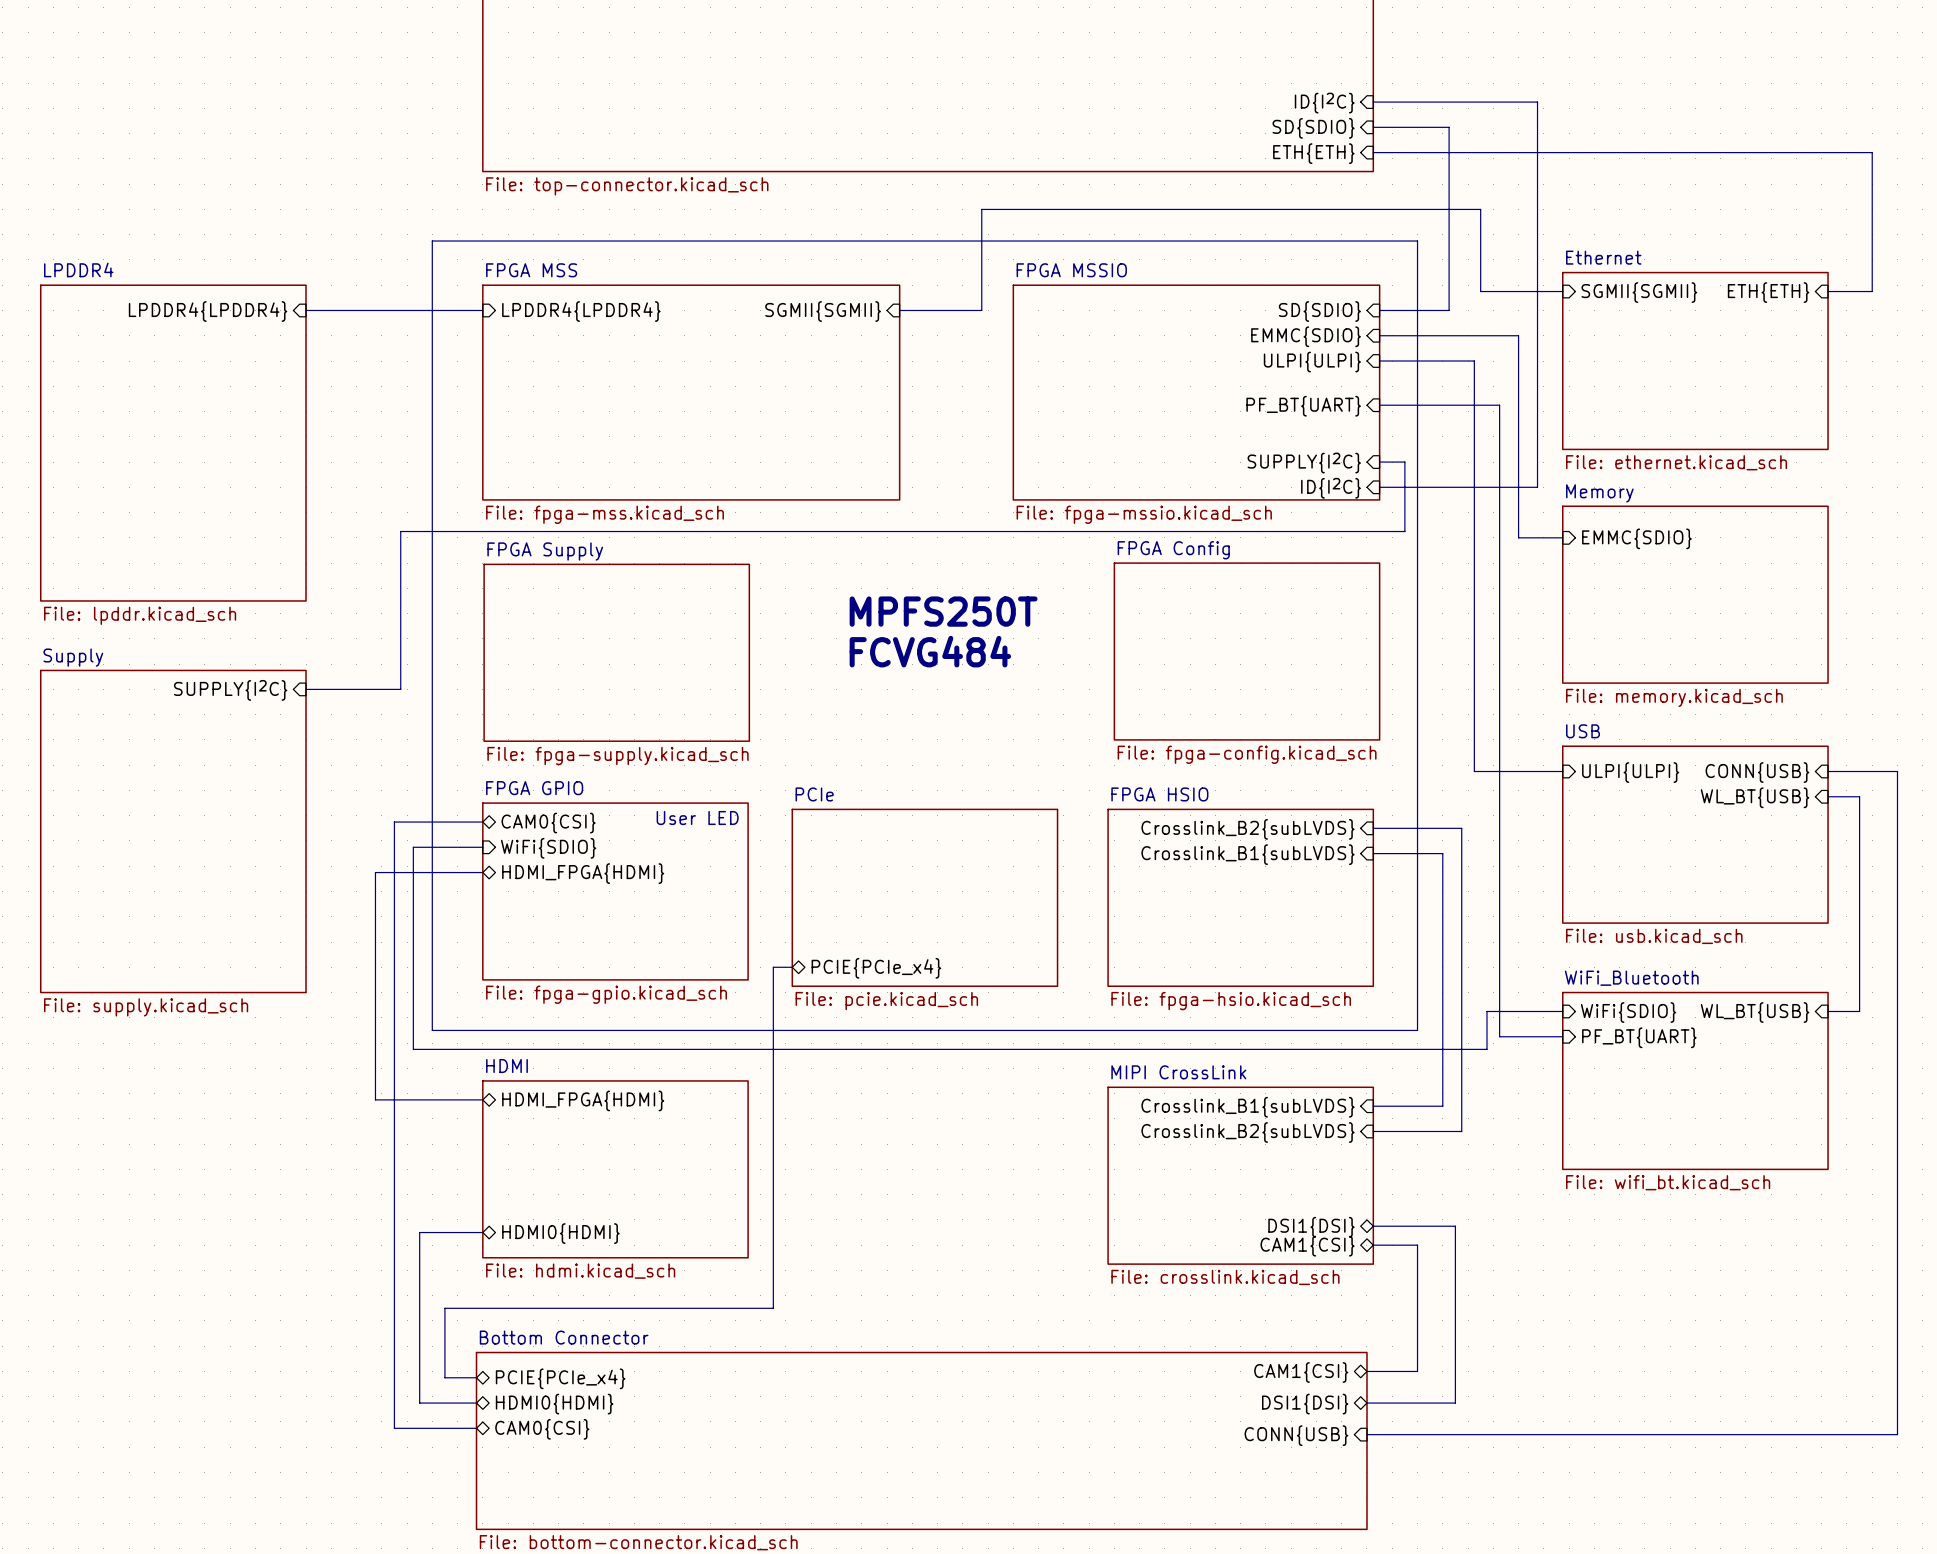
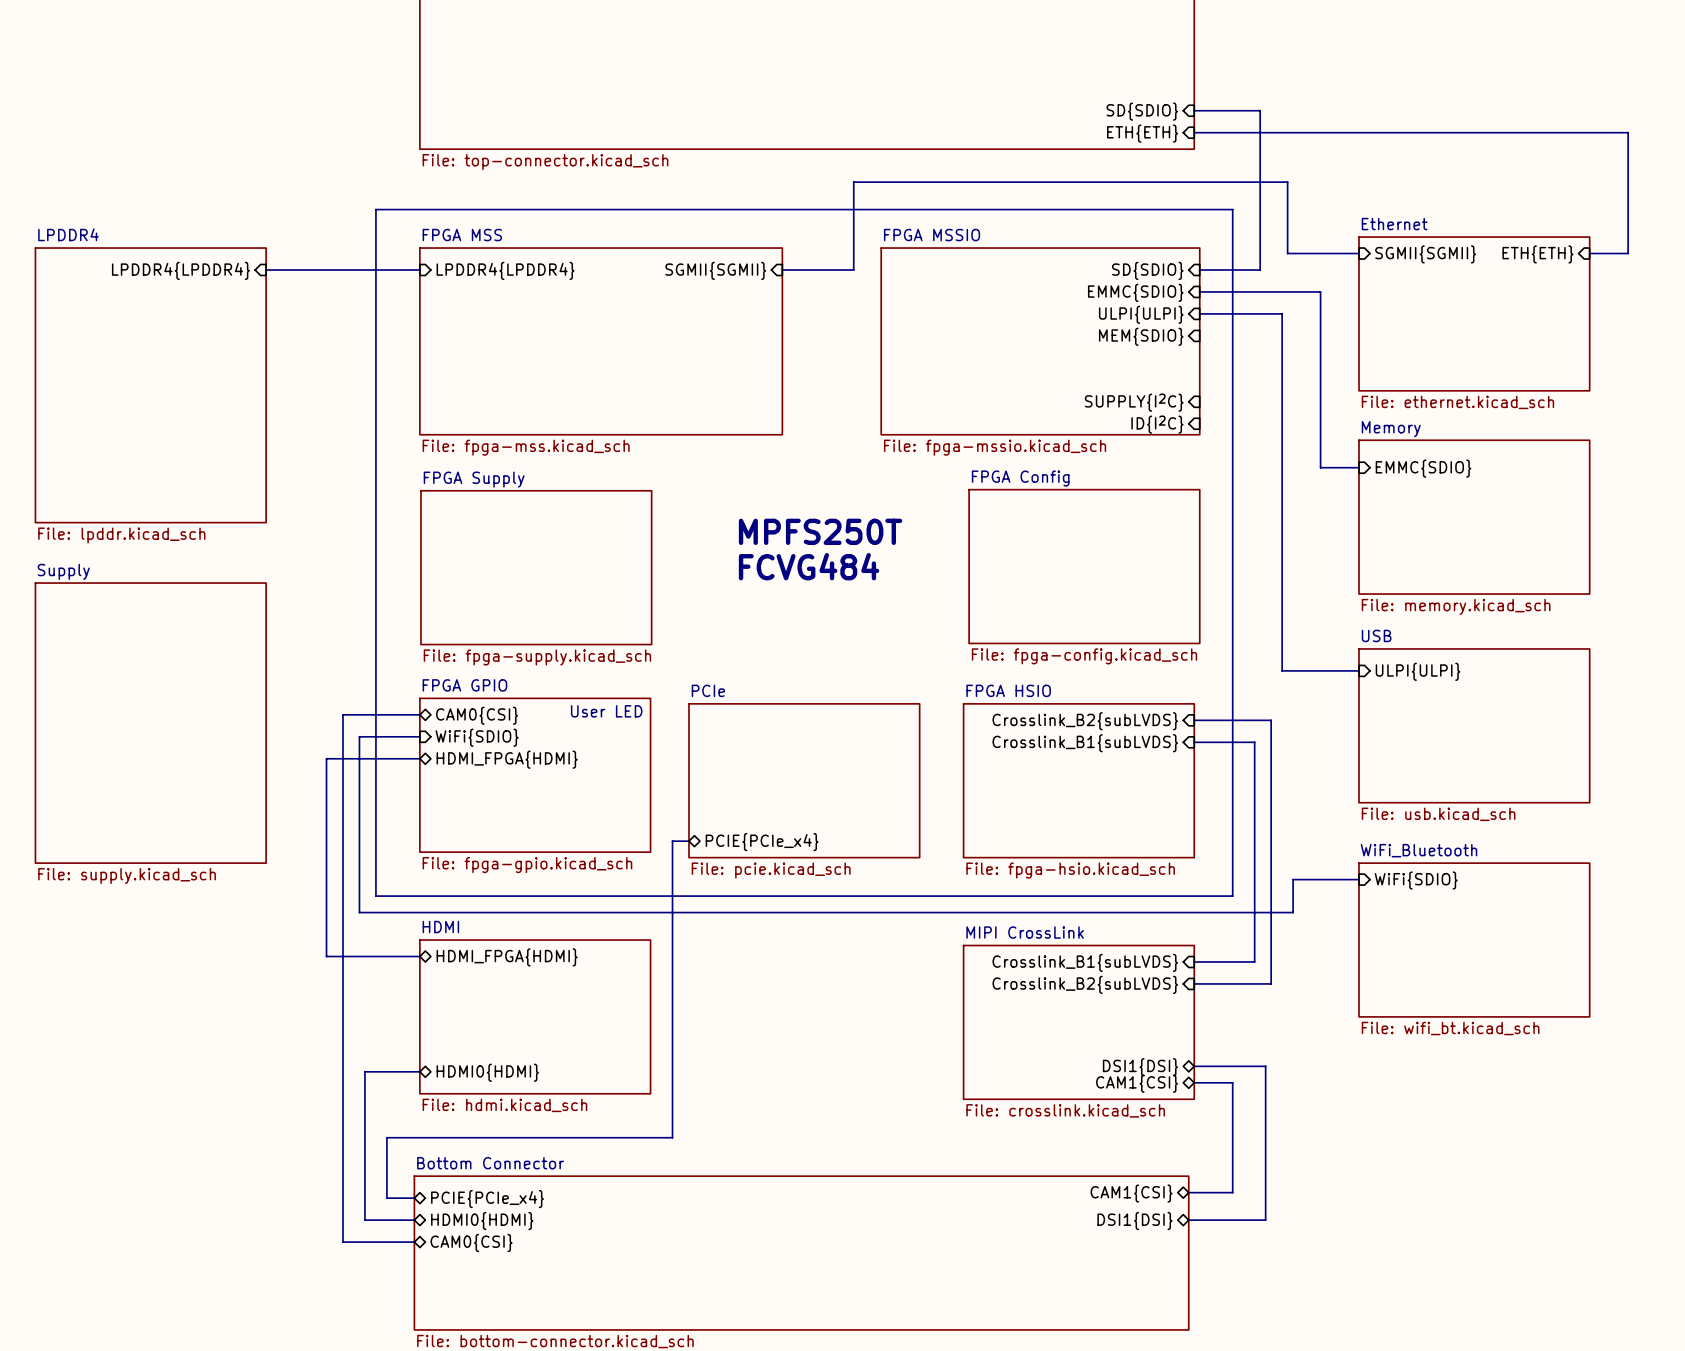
bus: (1373, 102) (1537, 102) (1537, 487) (1379, 487) -> none
sheet pin: ID{I2C} (1324, 103) -> none
sheet pin: none -> MEM{SDIO} (1141, 336)
bus: (1379, 405) (1499, 405) (1499, 1036) (1562, 1036) -> none
sheet pin: PF_BT{UART} (1303, 406) -> none
bus: (1379, 462) (1404, 462) (1404, 531) (400, 531) (400, 689) (306, 689) -> none
sheet pin: SUPPLY{I2C} (230, 690) -> none
bus: (1828, 771) (1897, 771) (1897, 1434) (1366, 1434) -> none
sheet pin: CONN{USB} (1757, 772) -> none
bus: (1828, 796) (1859, 796) (1859, 1011) (1828, 1011) -> none
sheet pin: WL_BT{USB} (1755, 797) -> none
sheet pin: WL_BT{USB} (1755, 1012) -> none
sheet pin: PF_BT{UART} (1639, 1037) -> none
sheet pin: CONN{USB} (1296, 1435) -> none

